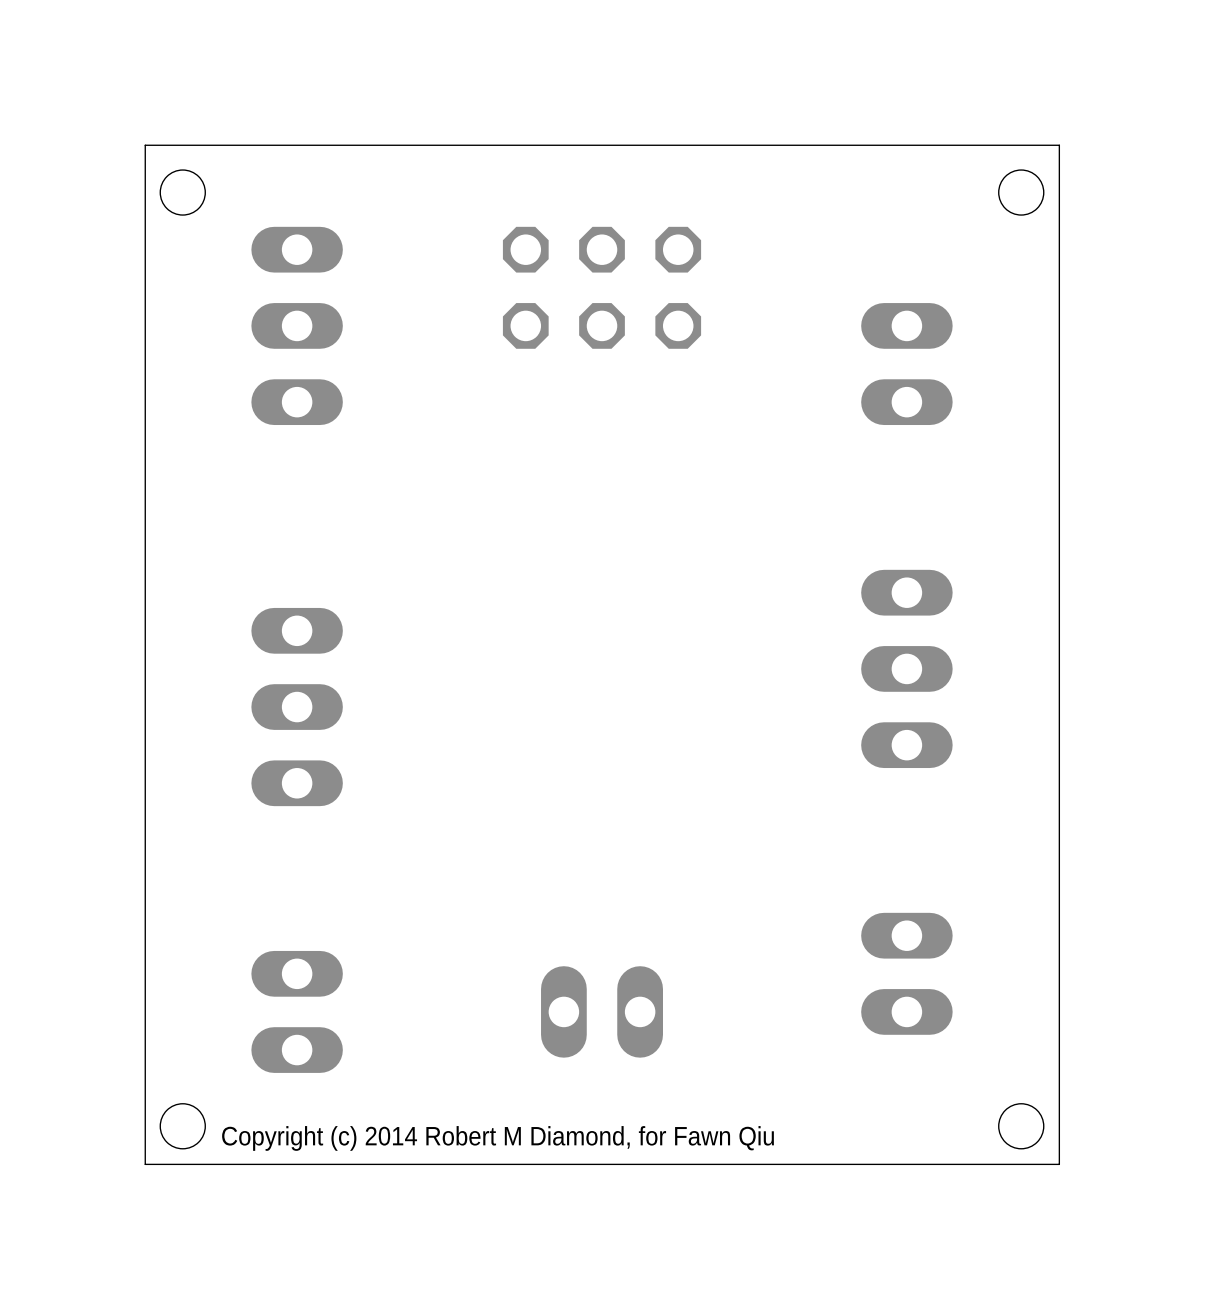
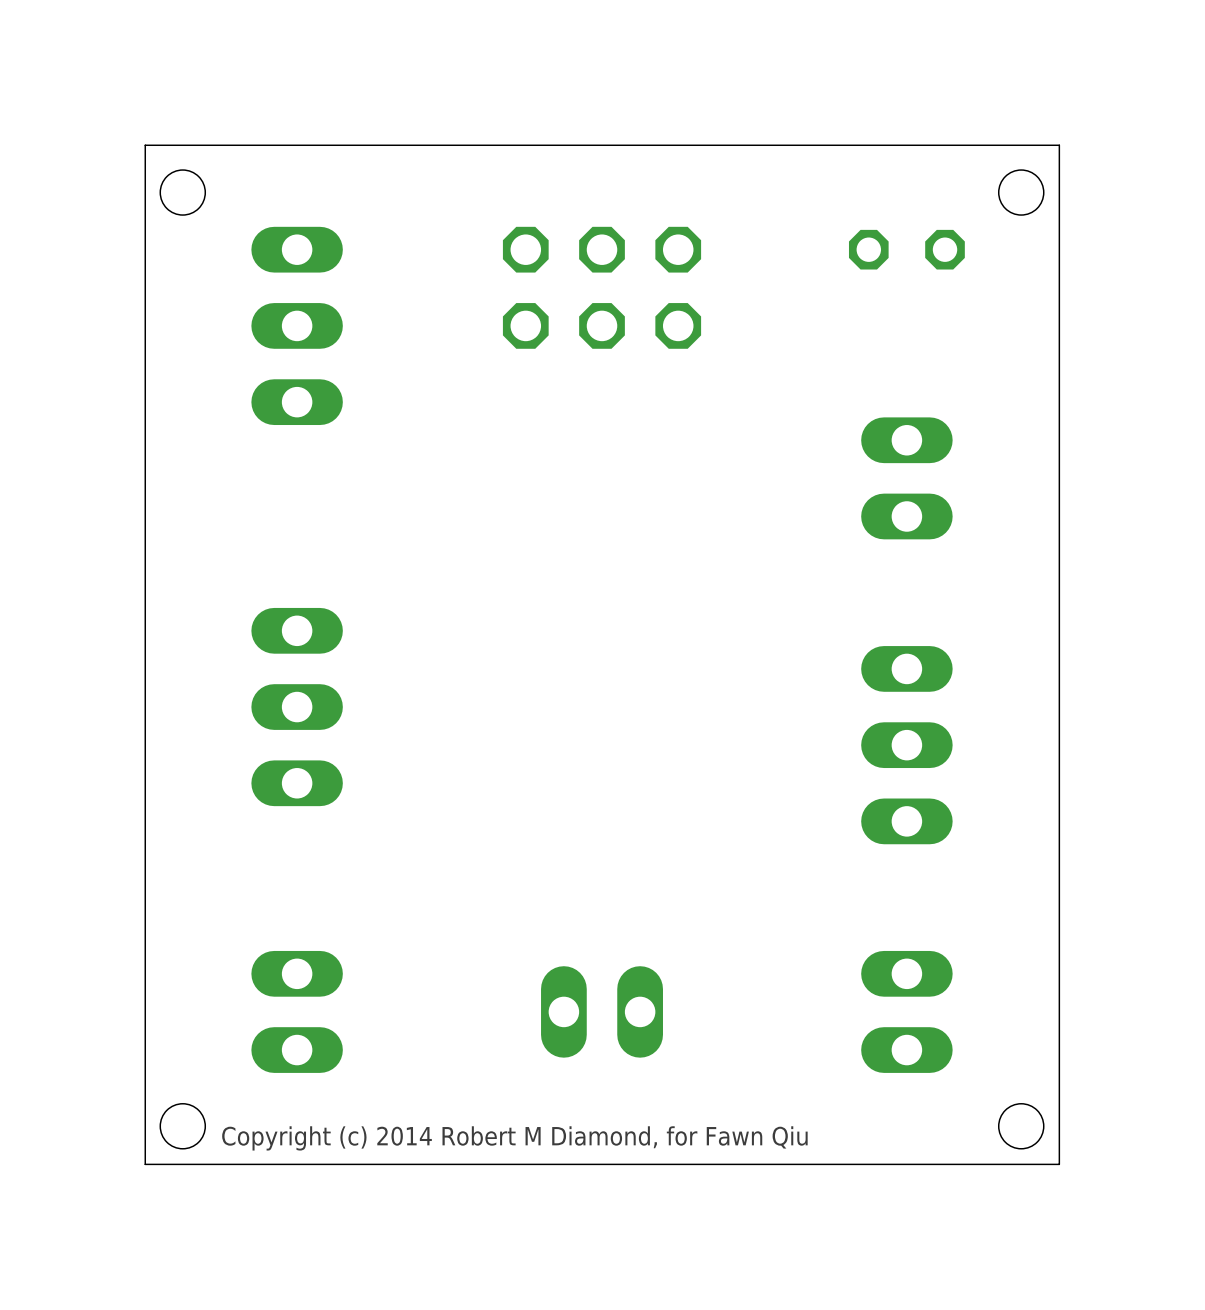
part: none -> (906, 249)
part position: (906, 364) -> (906, 478)
part position: (906, 668) -> (906, 745)
part position: (906, 973) -> (906, 1011)

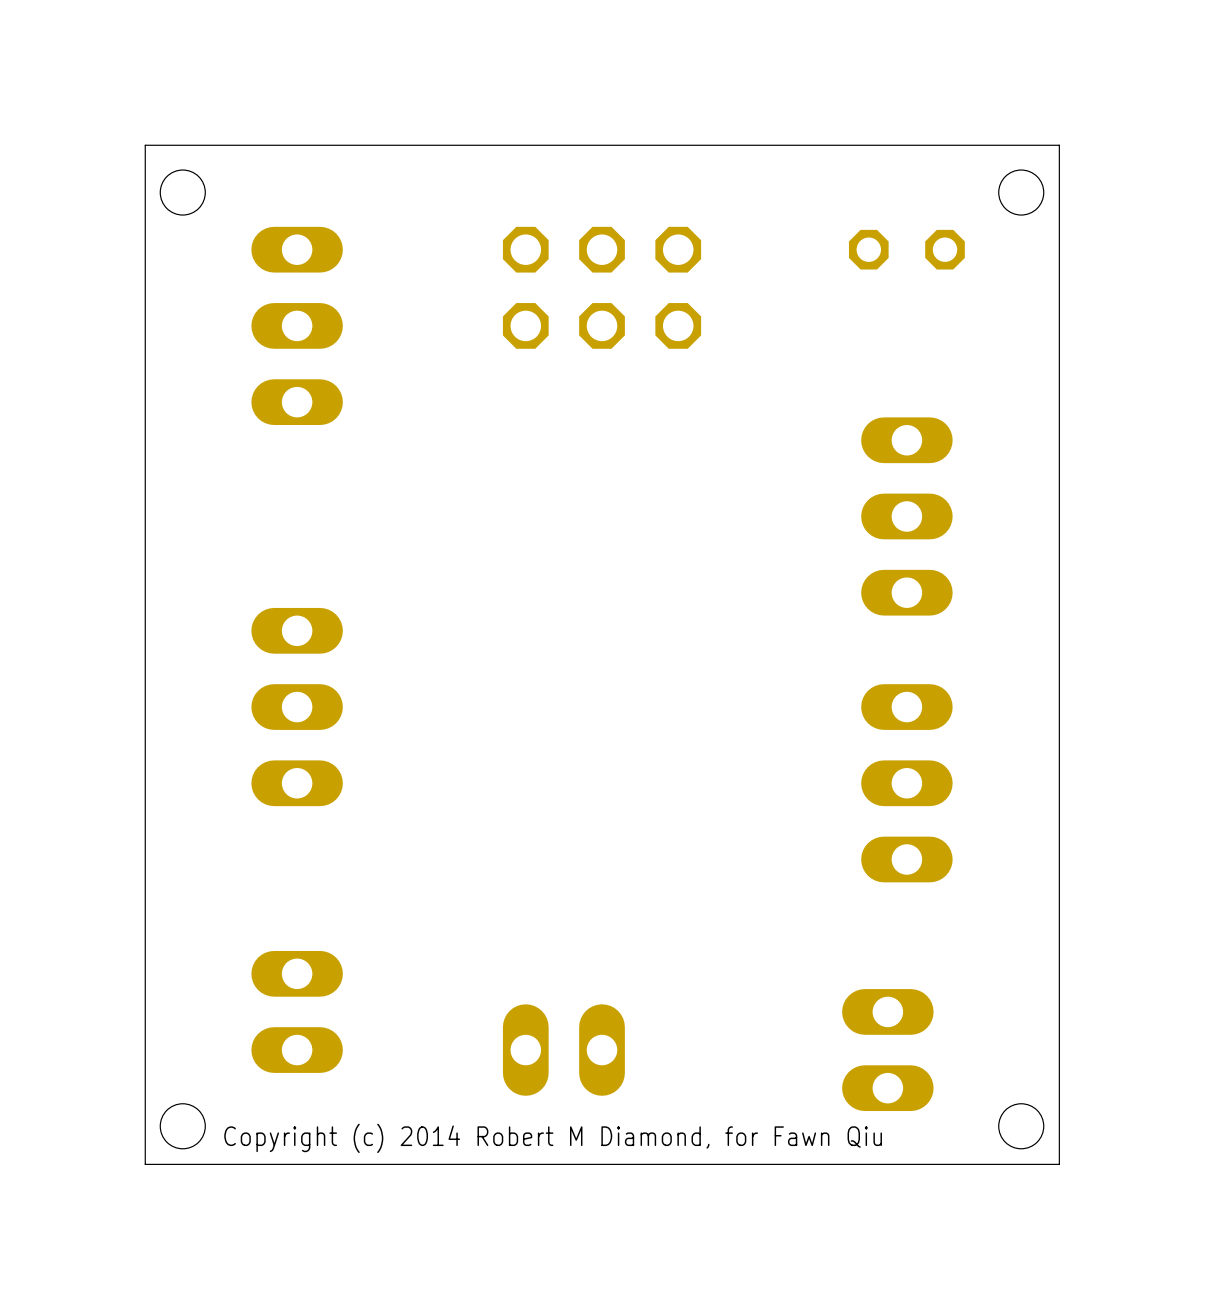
part: none -> (906, 516)
part position: (906, 745) -> (906, 783)
part position: (602, 1011) -> (563, 1050)
part position: (906, 1011) -> (887, 1050)

